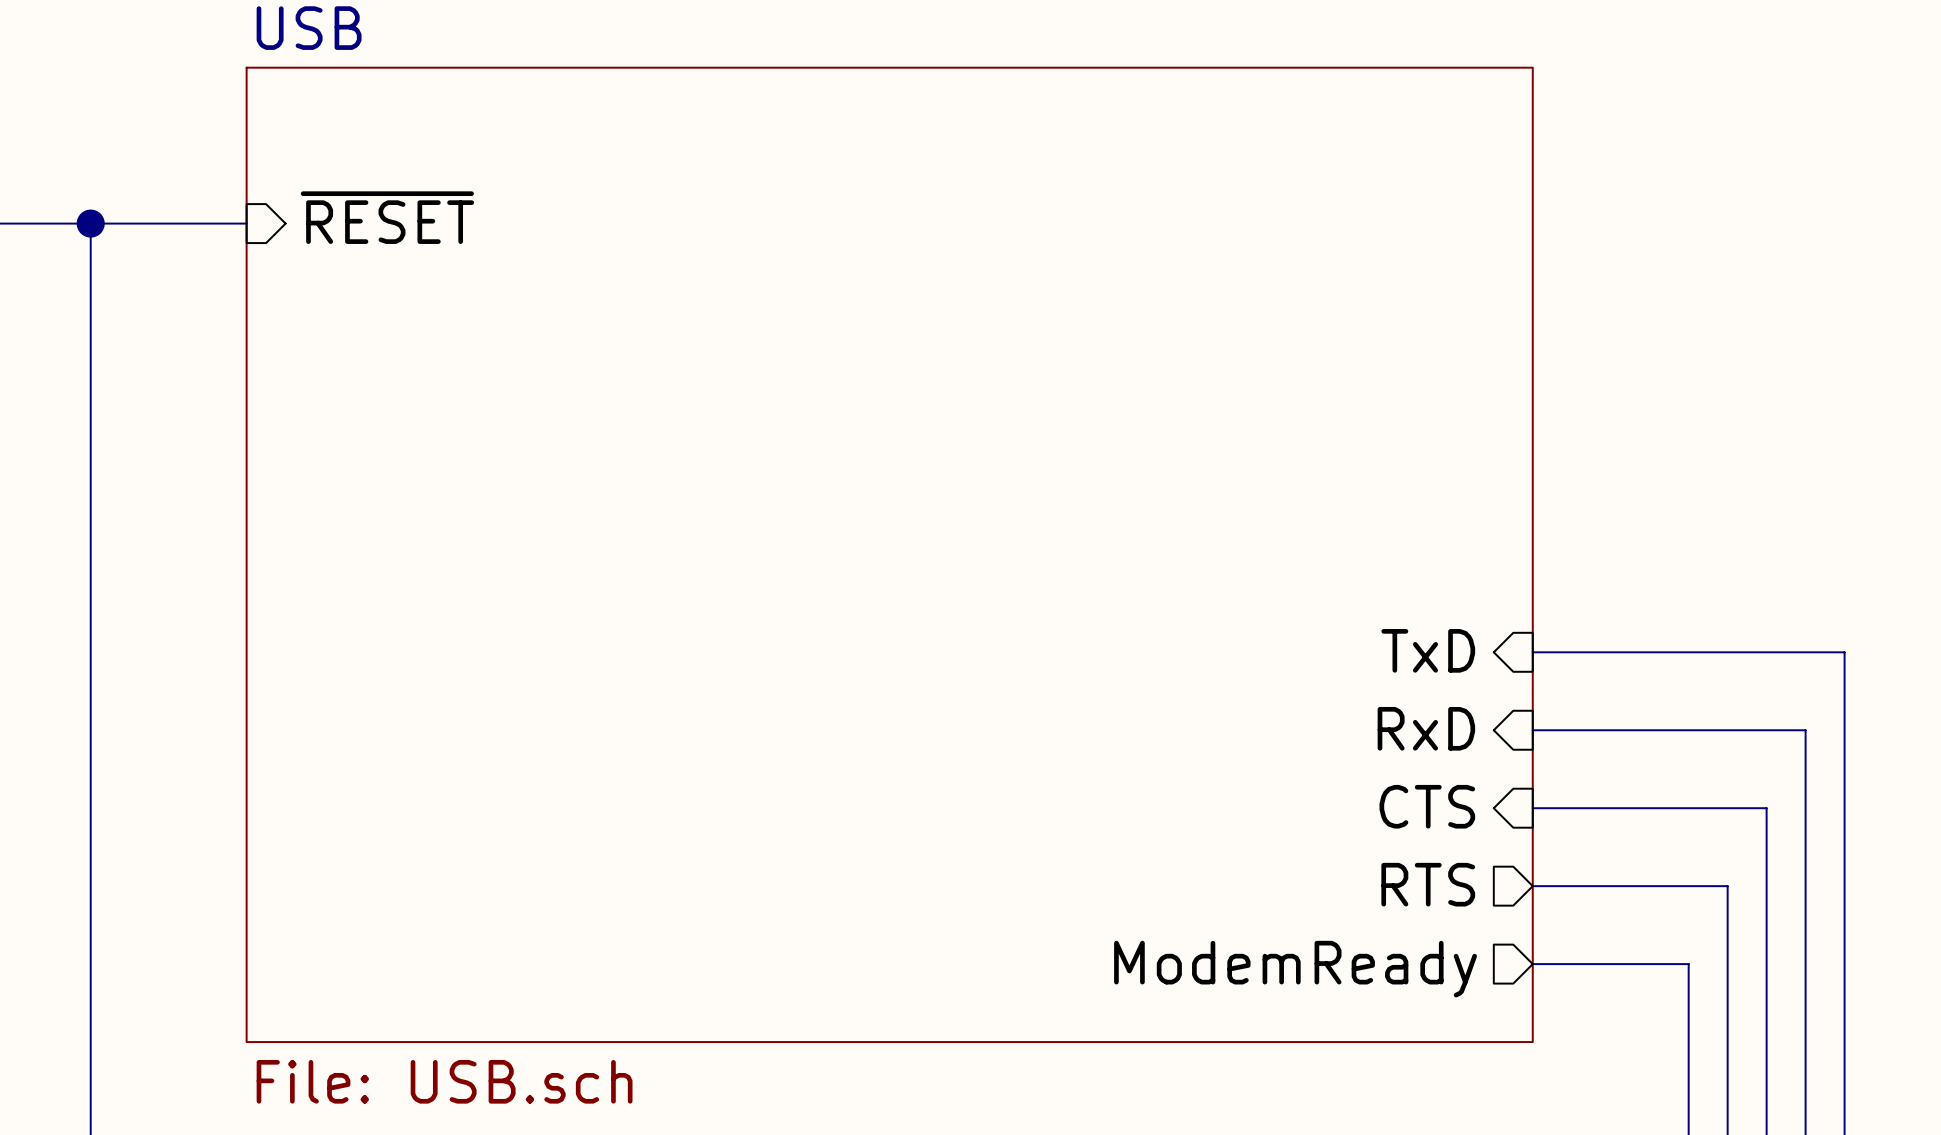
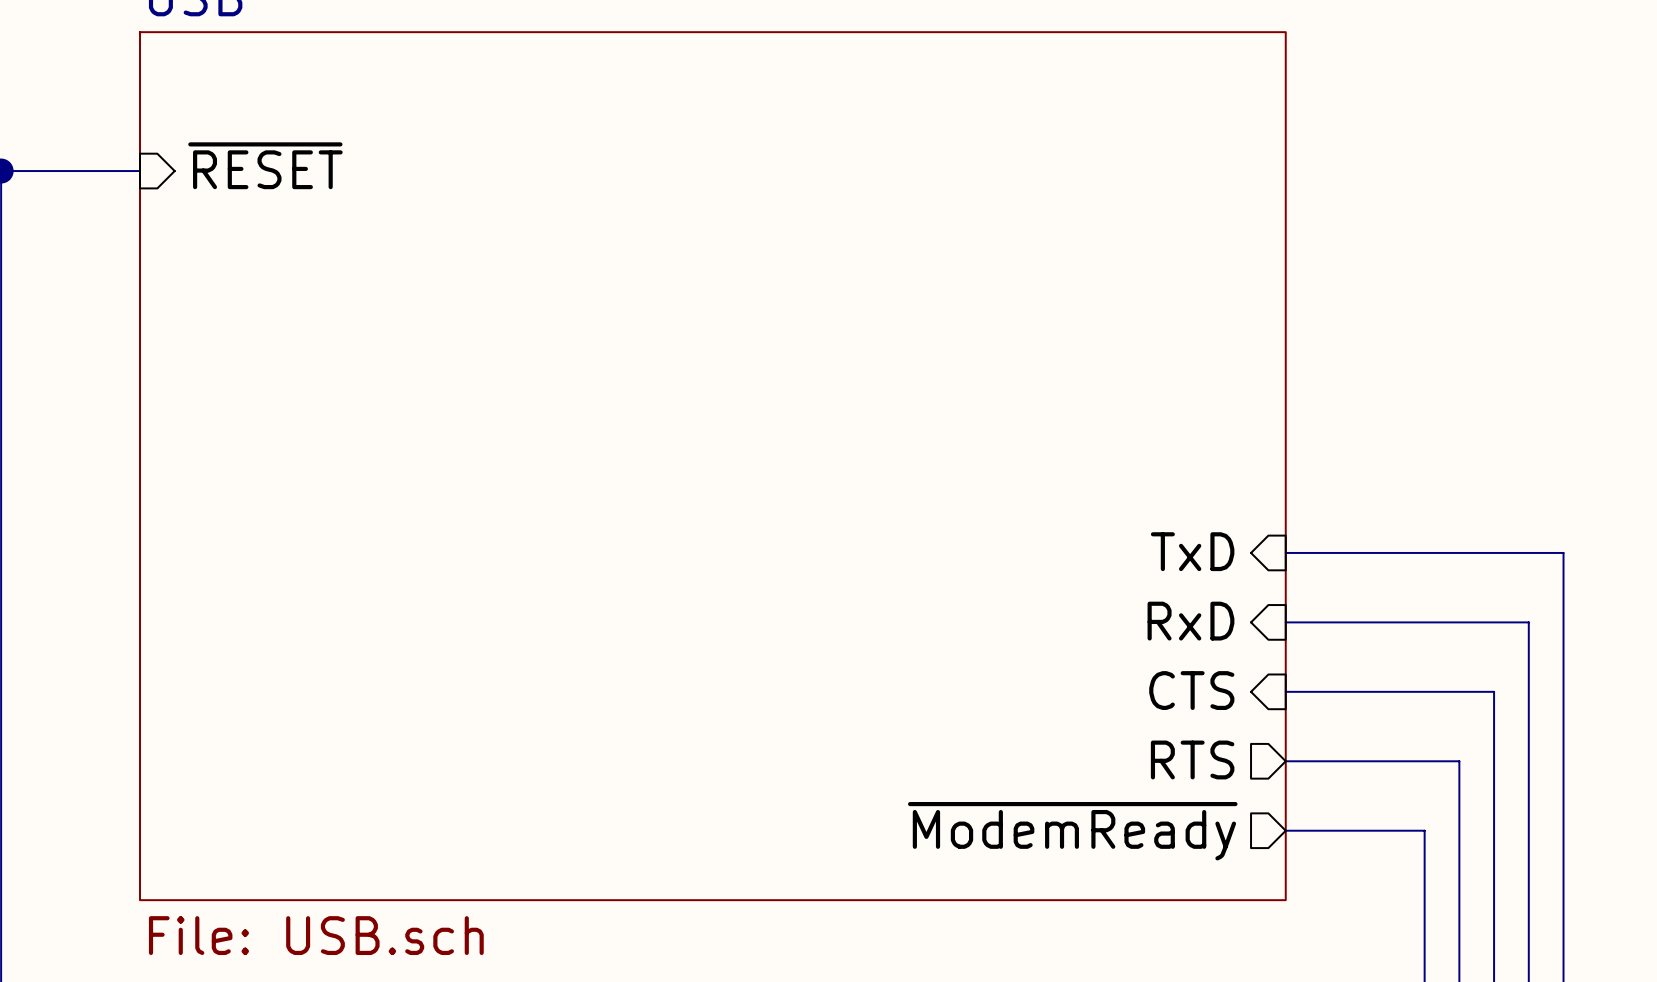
sheet pin: ModemReady (1295, 969) -> ~{ModemReady} (1072, 831)

